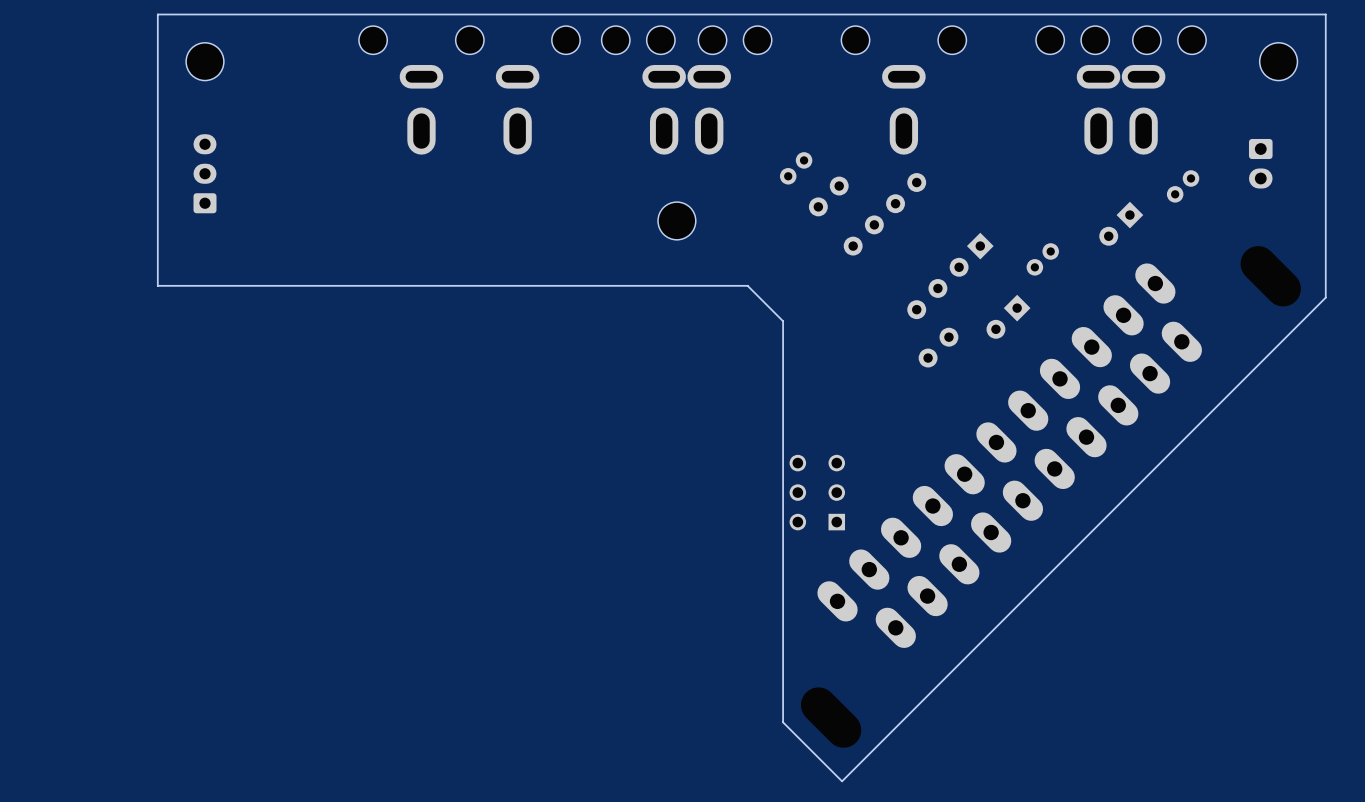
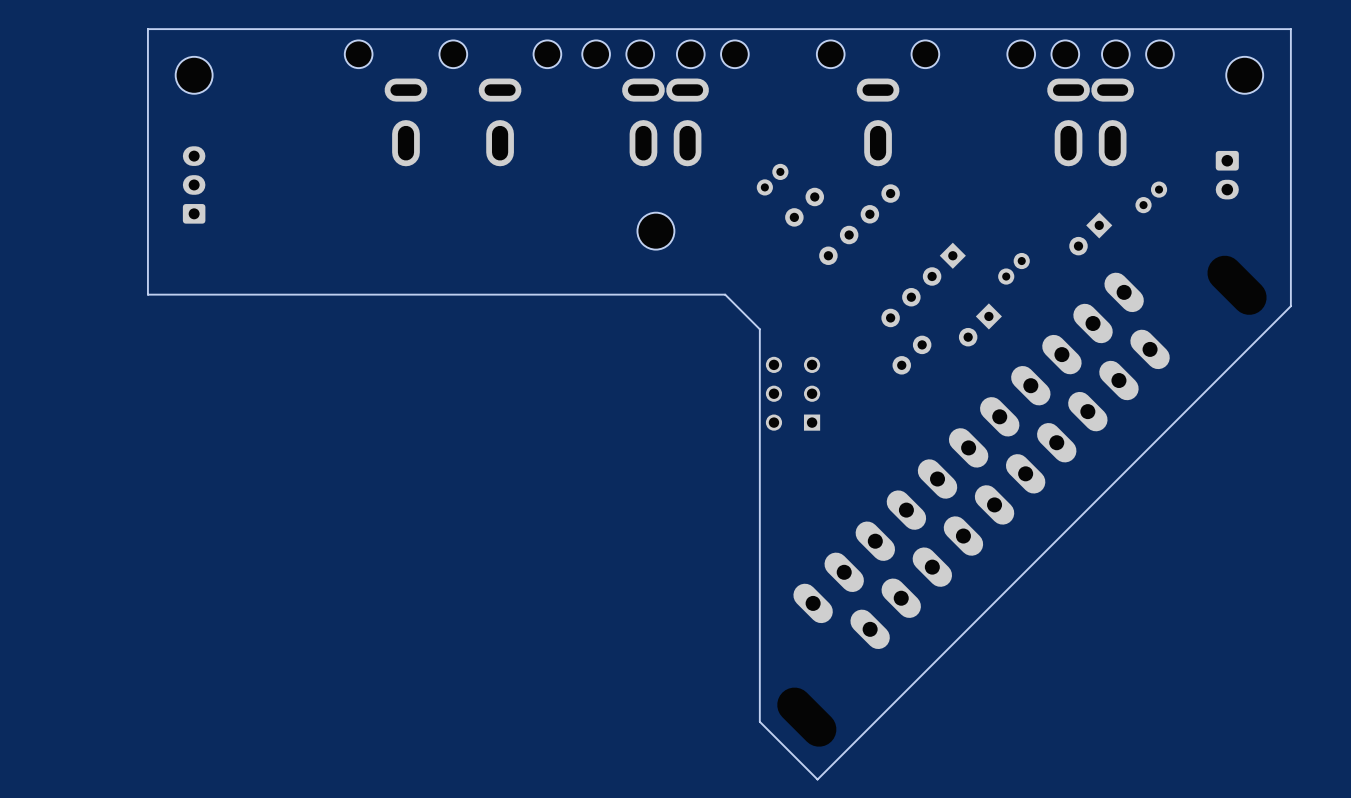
part position: (817, 492) -> (793, 393)

